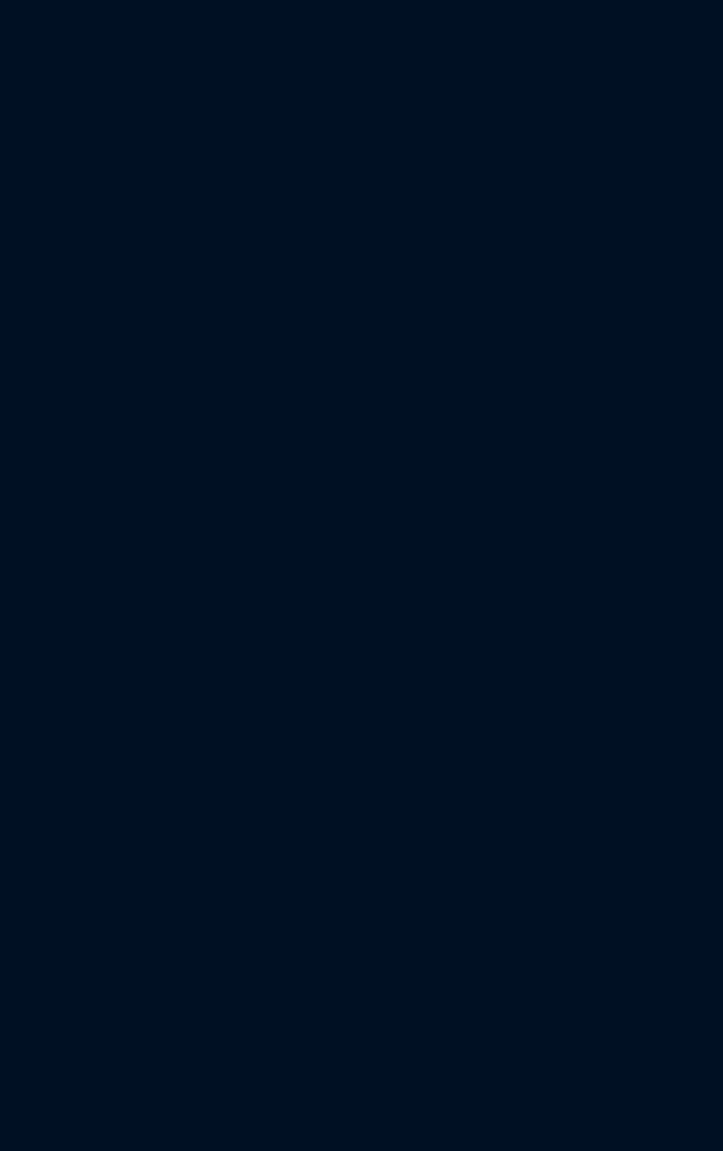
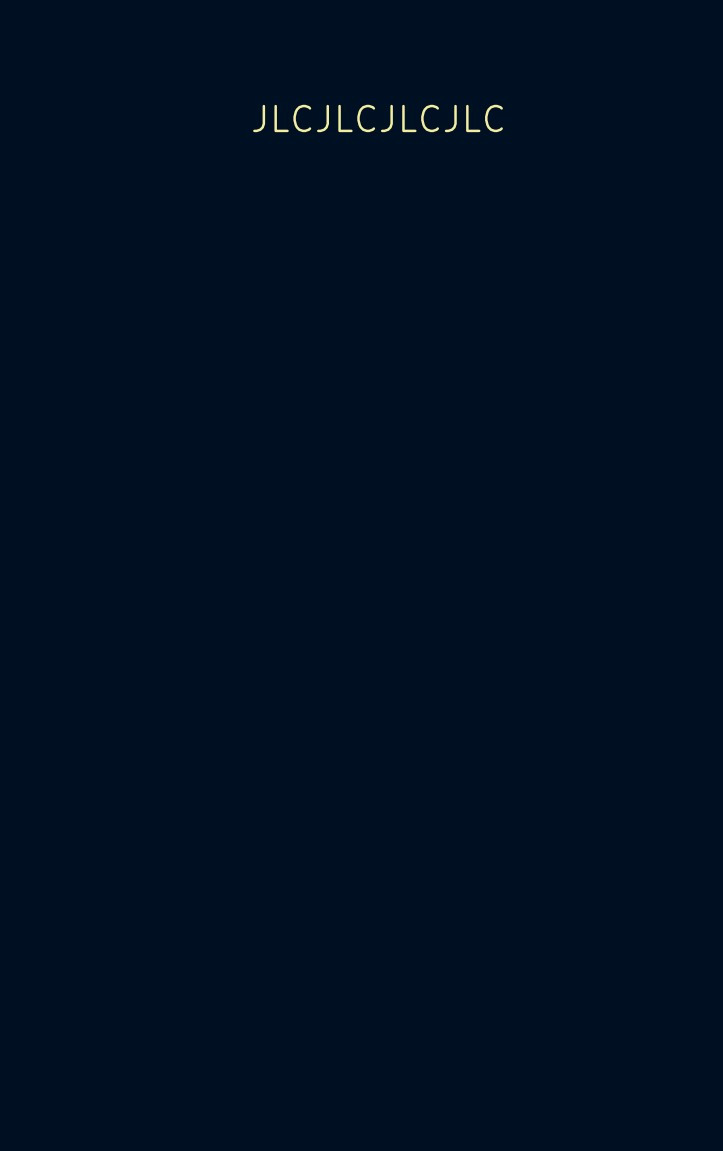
text: none -> JLCJLCJLCJLC (378, 118)

